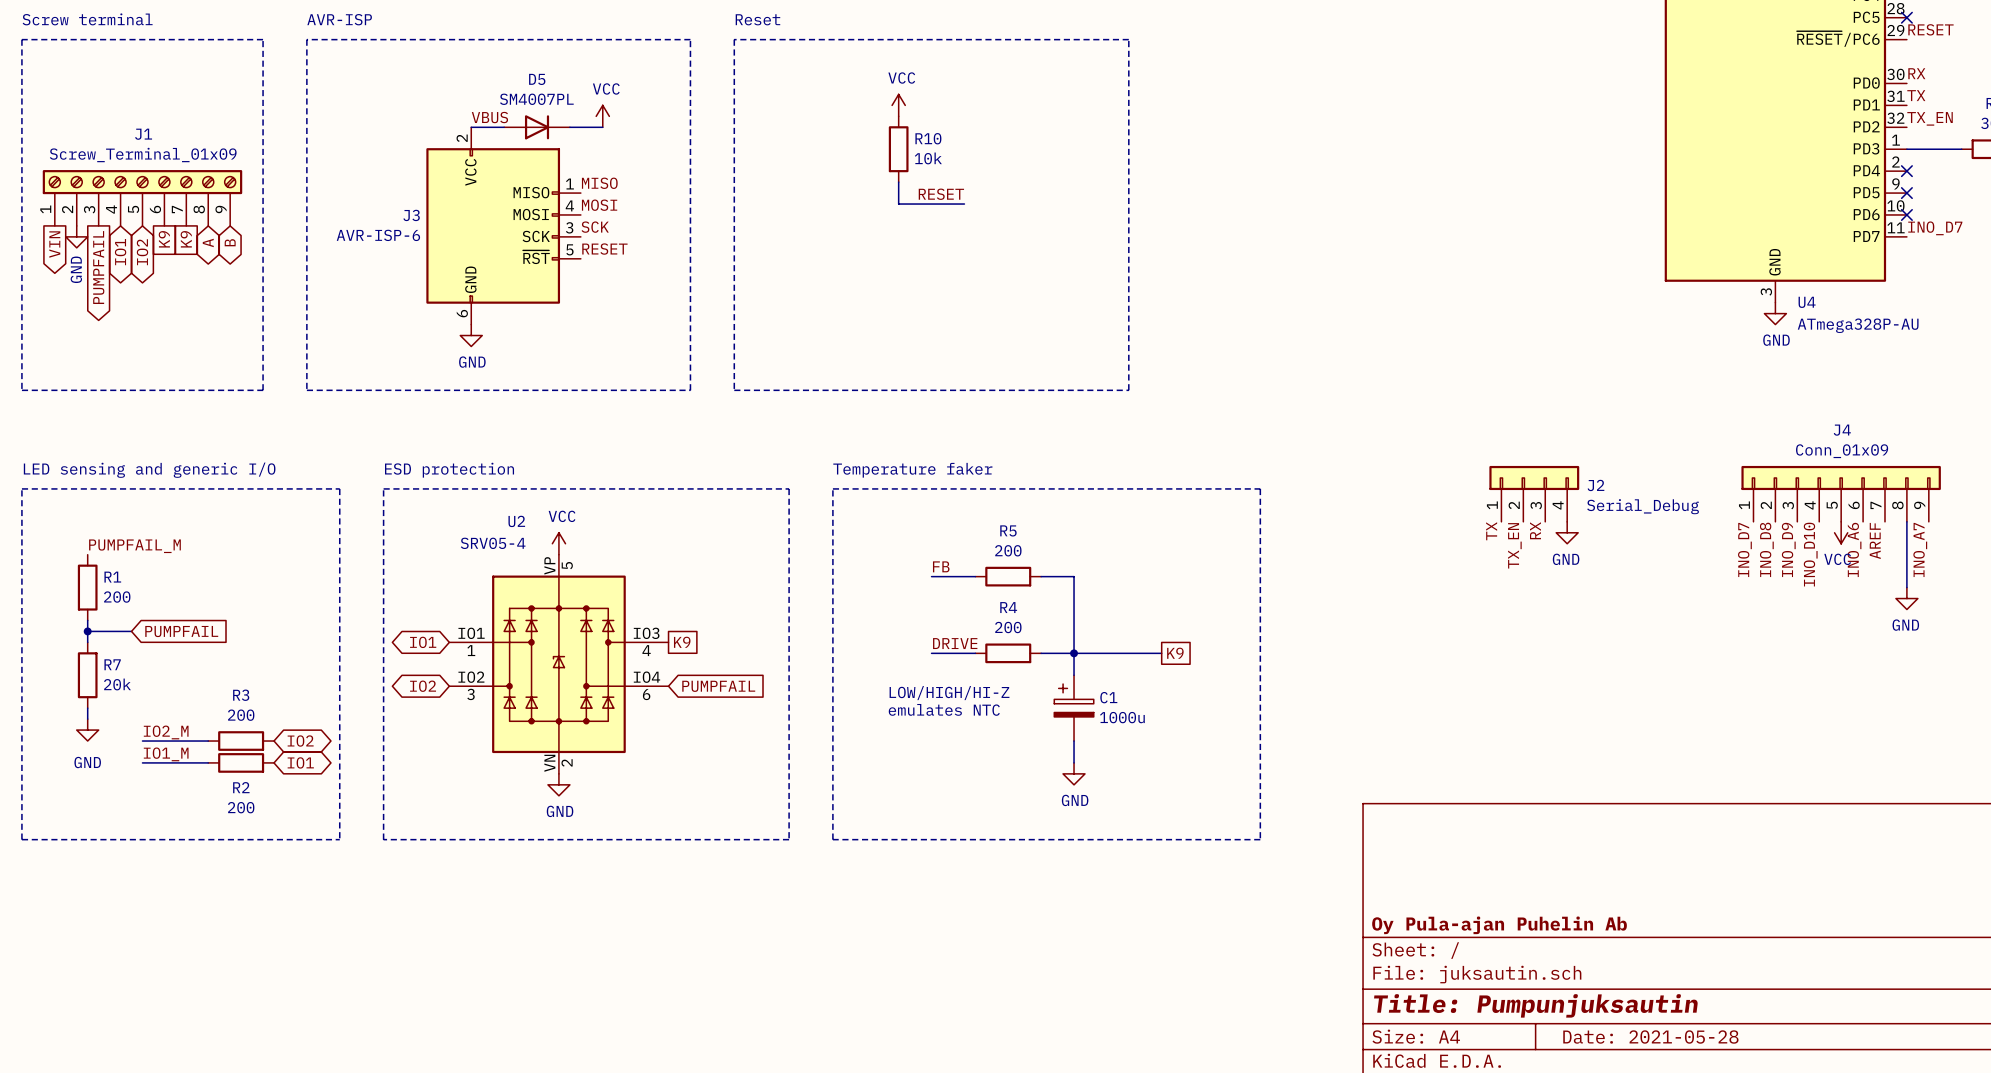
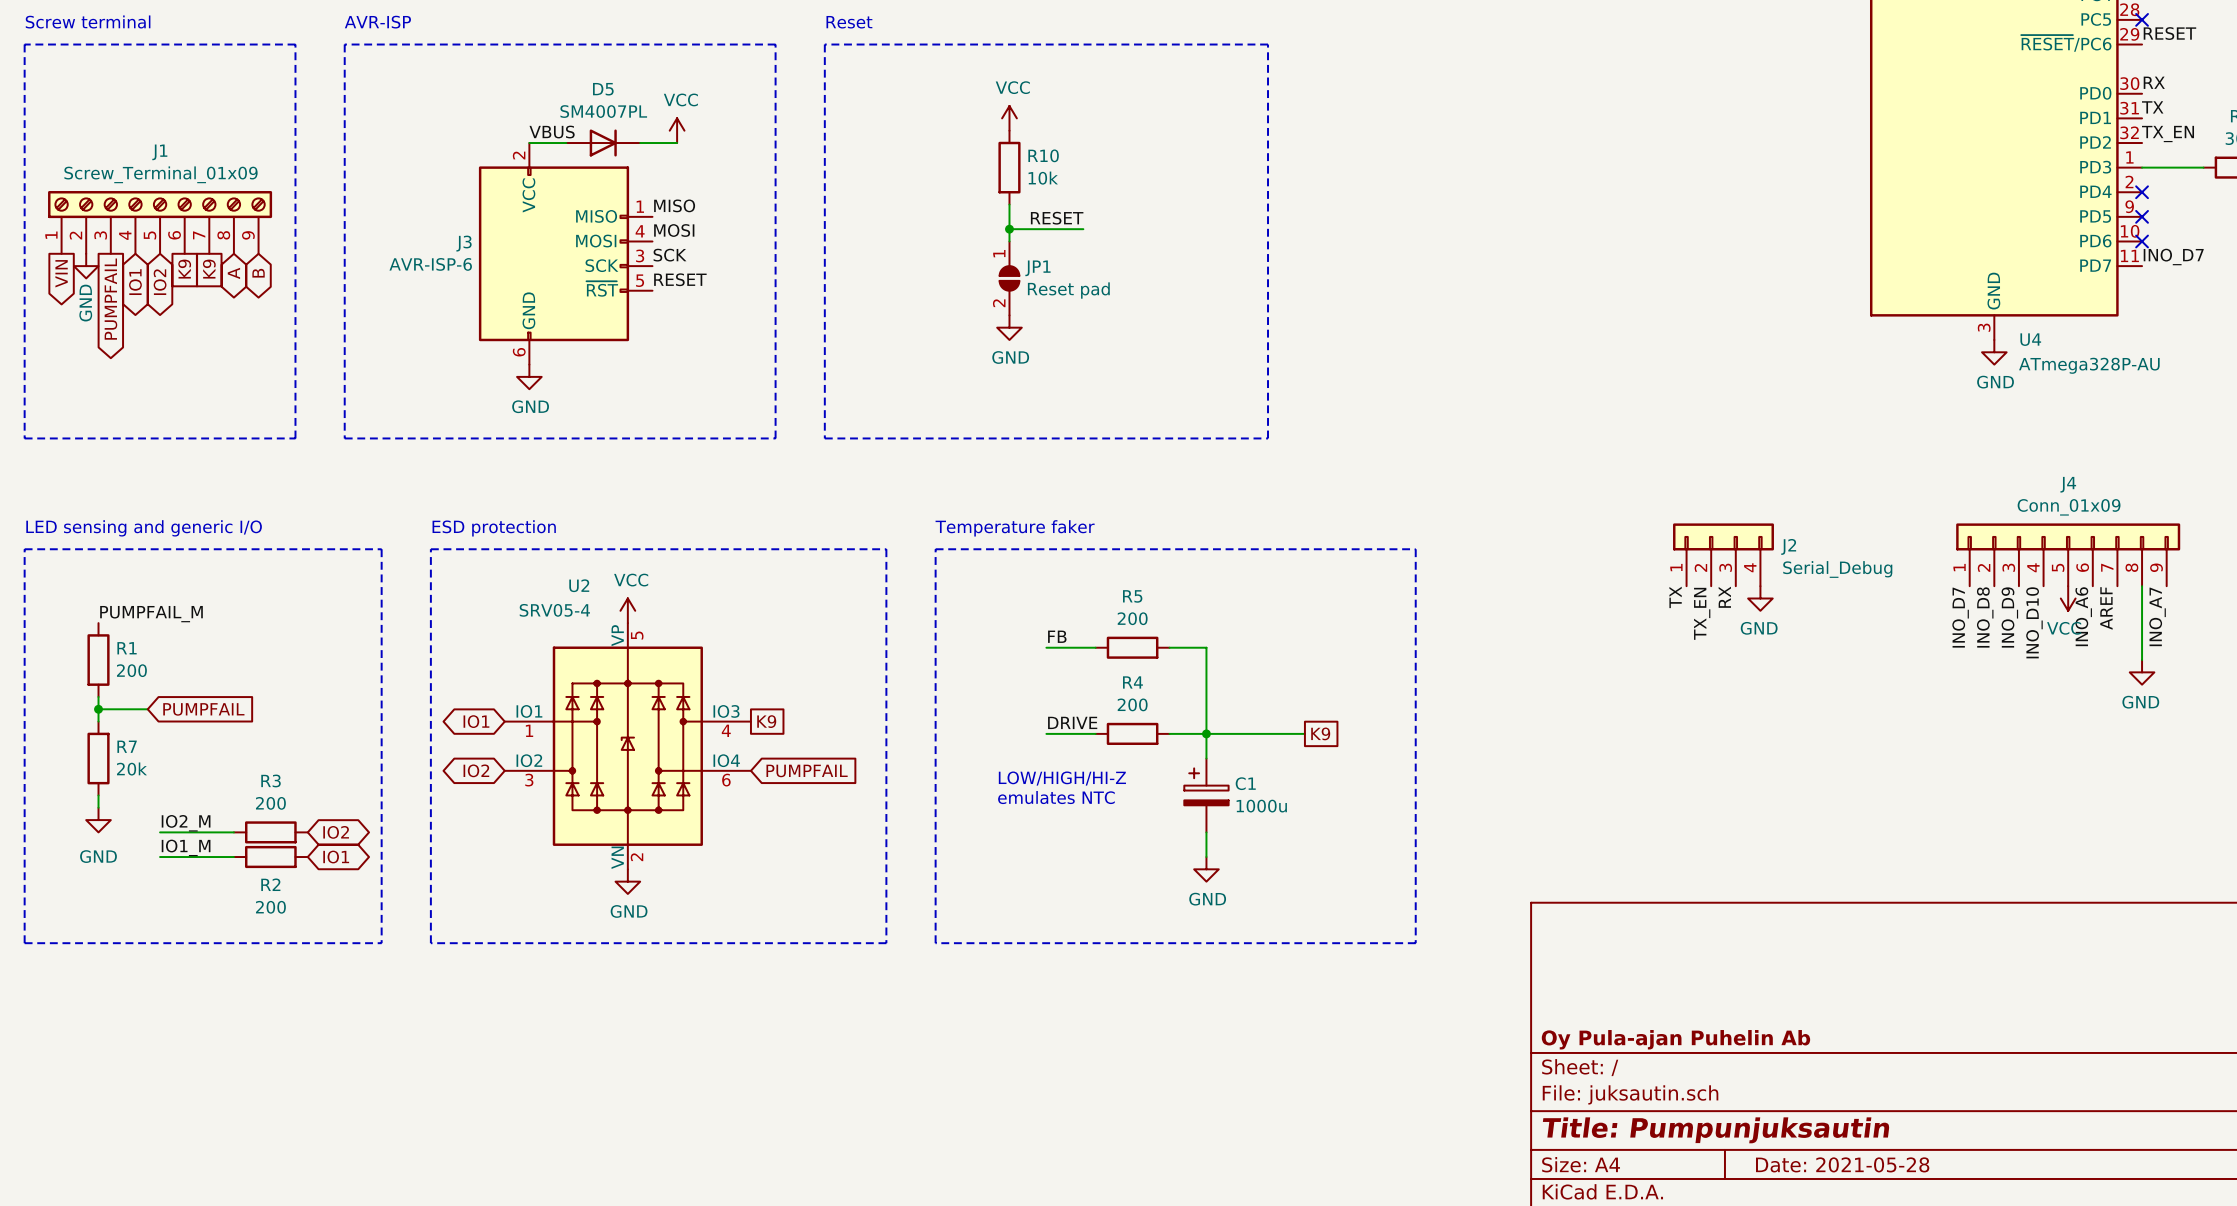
wire: none -> (1009, 229) (1009, 241)
junction: none -> (1009, 229)
JP1: none -> Reset pad (1009, 278)
power symbol: none -> GND (1009, 327)

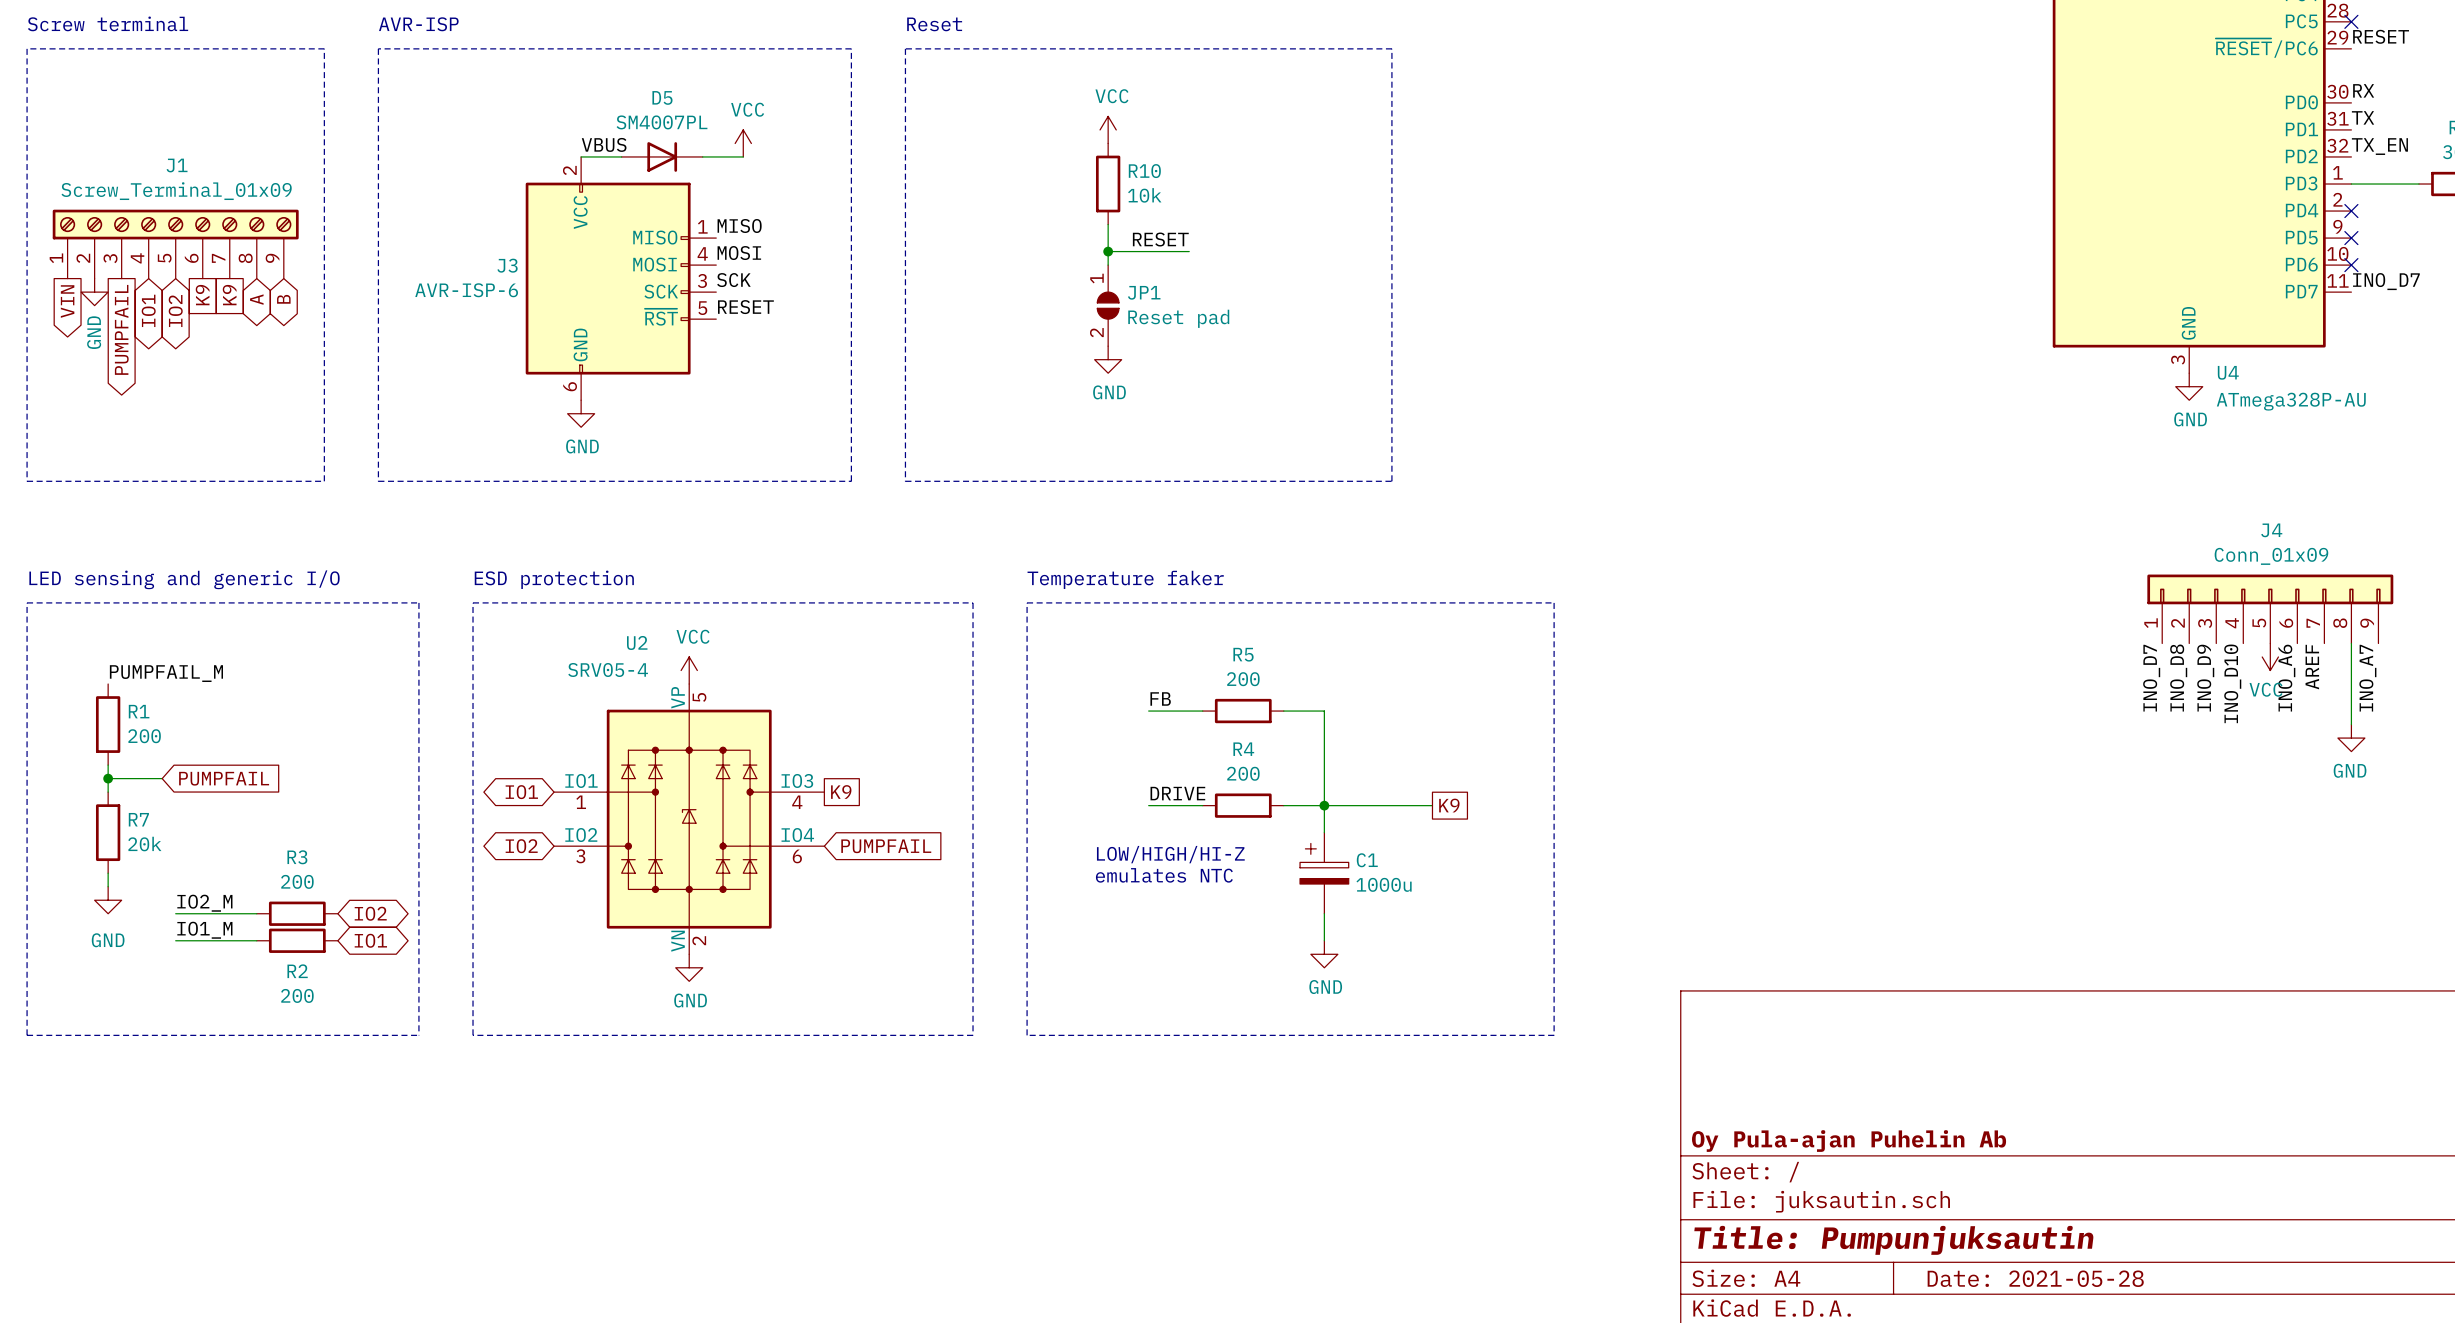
J2: Serial_Debug (1723, 554) -> none
label: TX (1675, 597) -> none
label: RX (1724, 597) -> none
power symbol: GND (1760, 598) -> none
label: TX_EN (1702, 613) -> none

